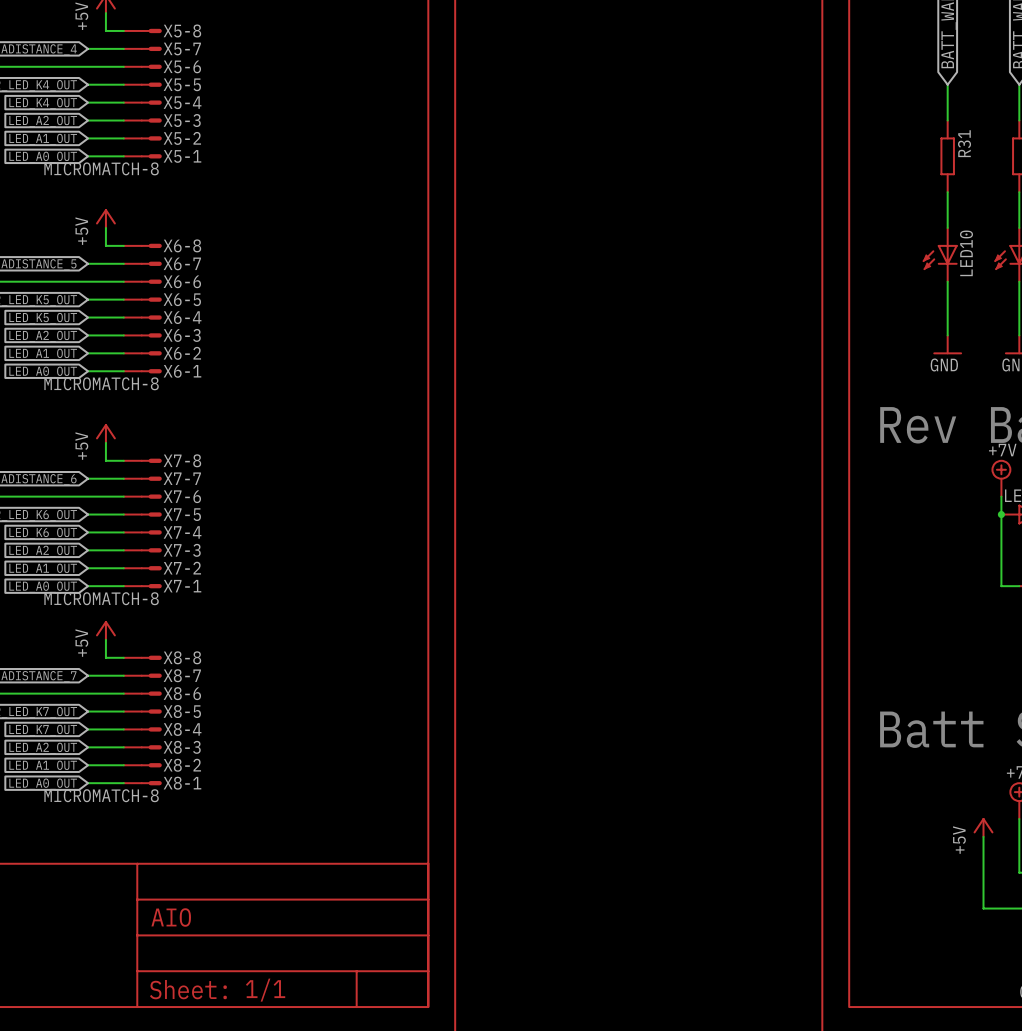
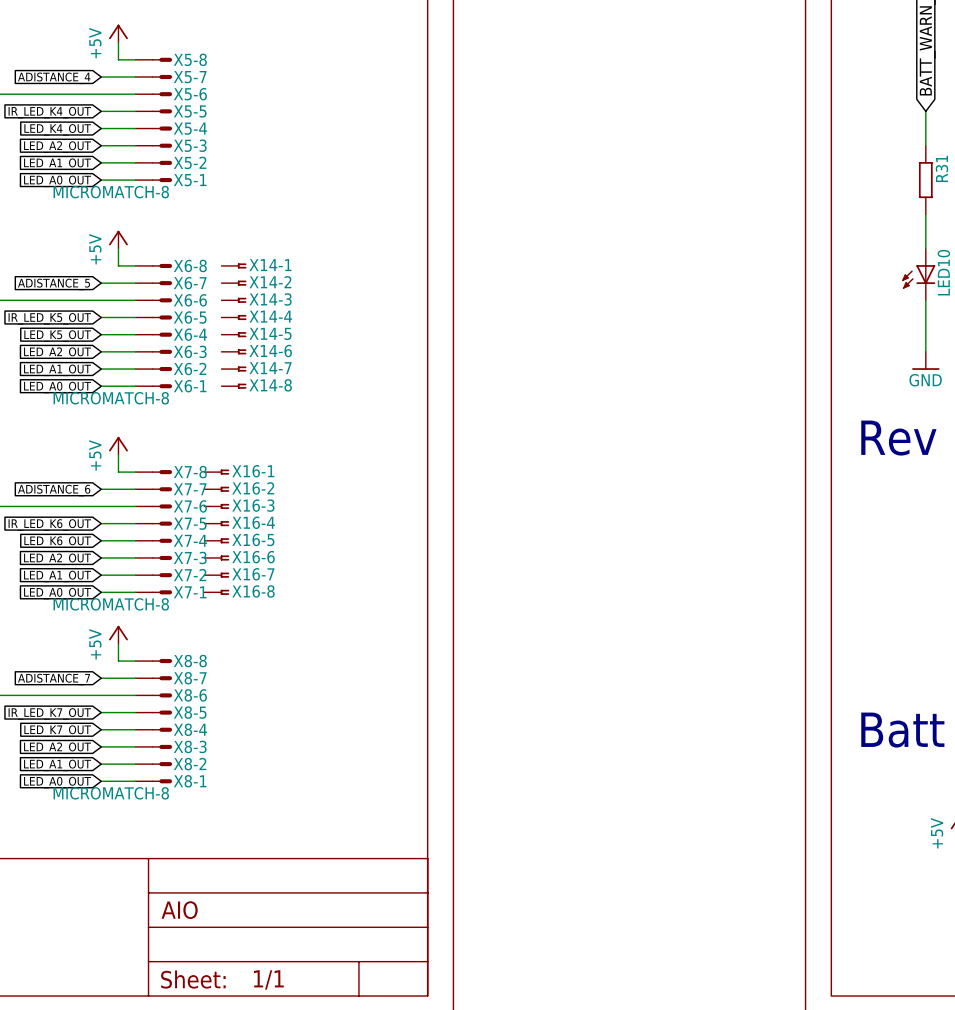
X14-1: none -> (233, 265)
X14-2: none -> (233, 283)
X14-3: none -> (233, 300)
X14-4: none -> (233, 317)
X14-5: none -> (233, 334)
X14-6: none -> (233, 351)
X14-7: none -> (233, 369)
X14-8: none -> (233, 386)
X16-1: none -> (216, 472)
X16-2: none -> (216, 489)
X16-3: none -> (216, 506)
X16-4: none -> (216, 523)
X16-5: none -> (216, 540)
X16-6: none -> (216, 557)
X16-7: none -> (216, 575)
X16-8: none -> (216, 592)

